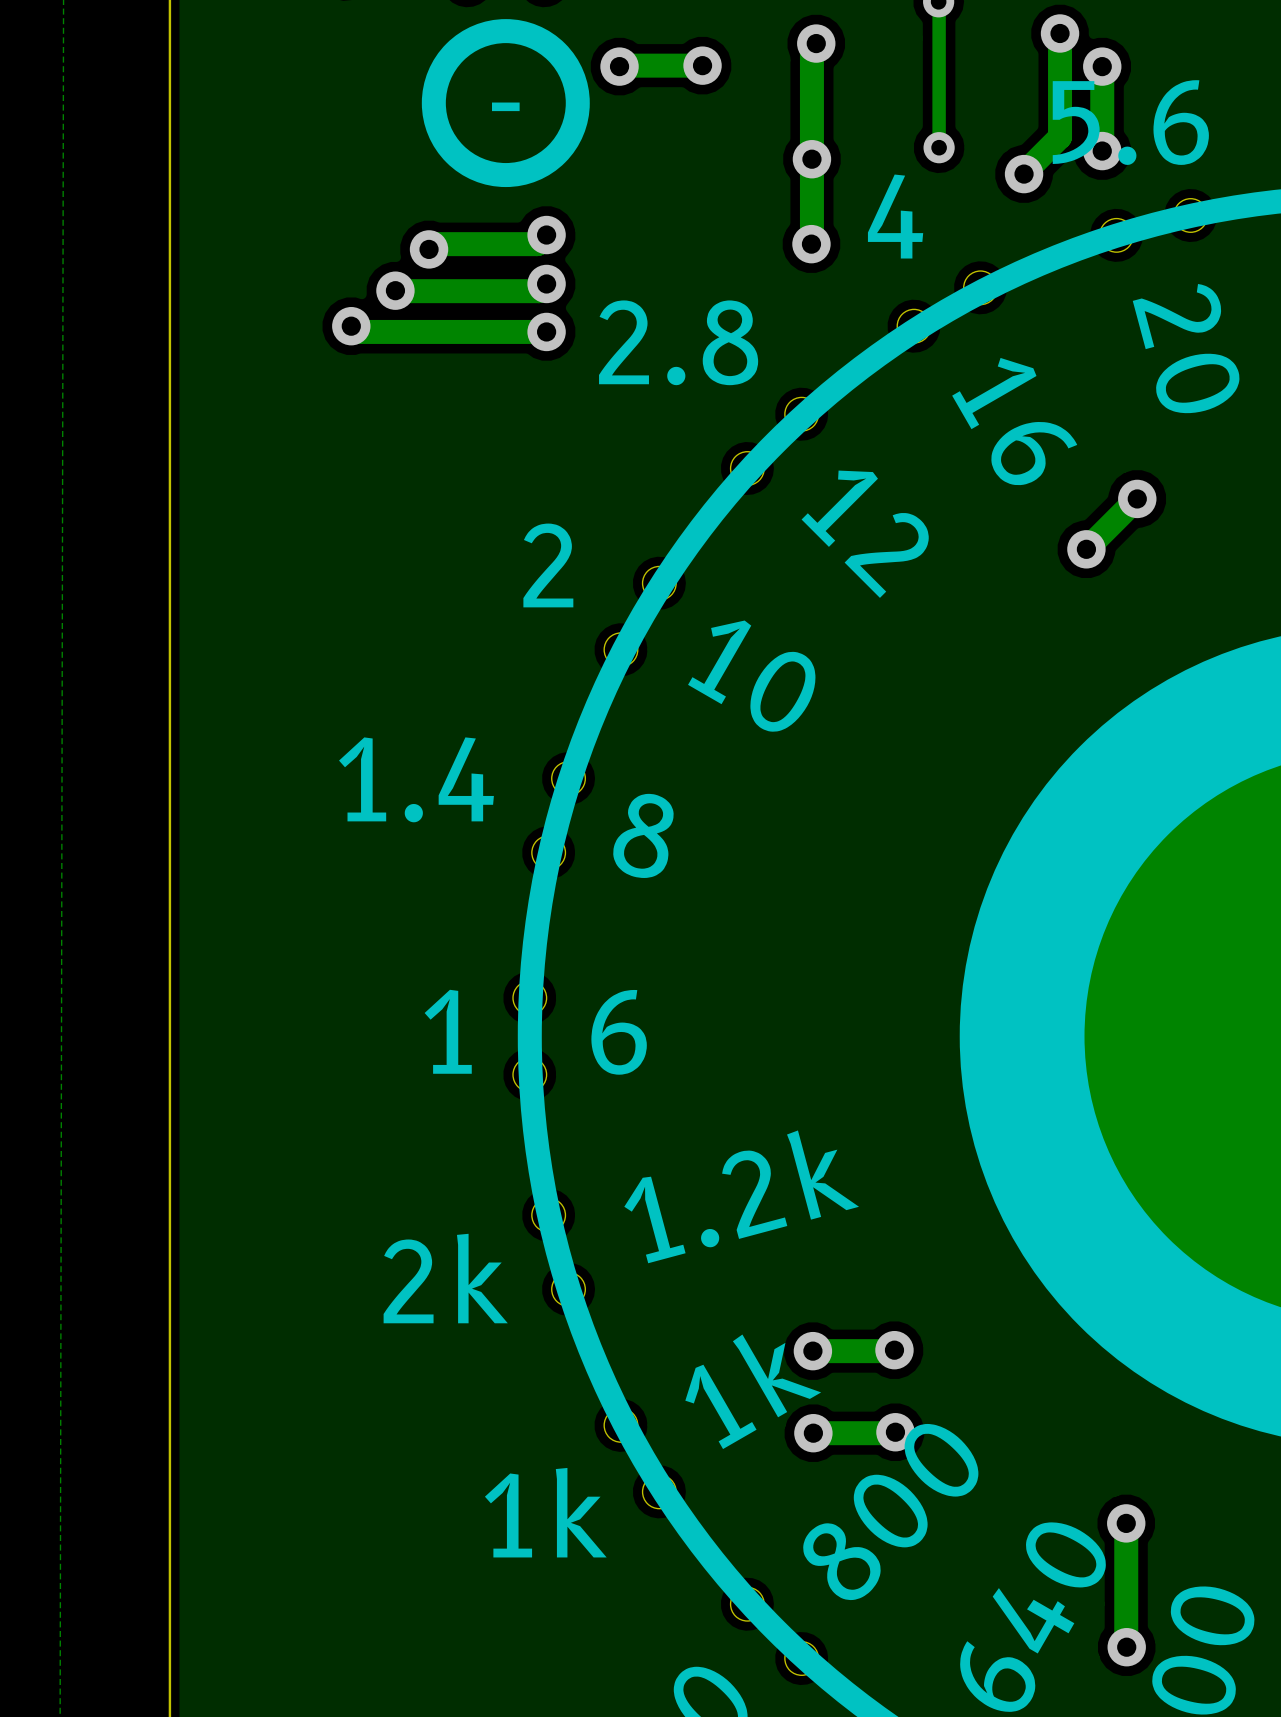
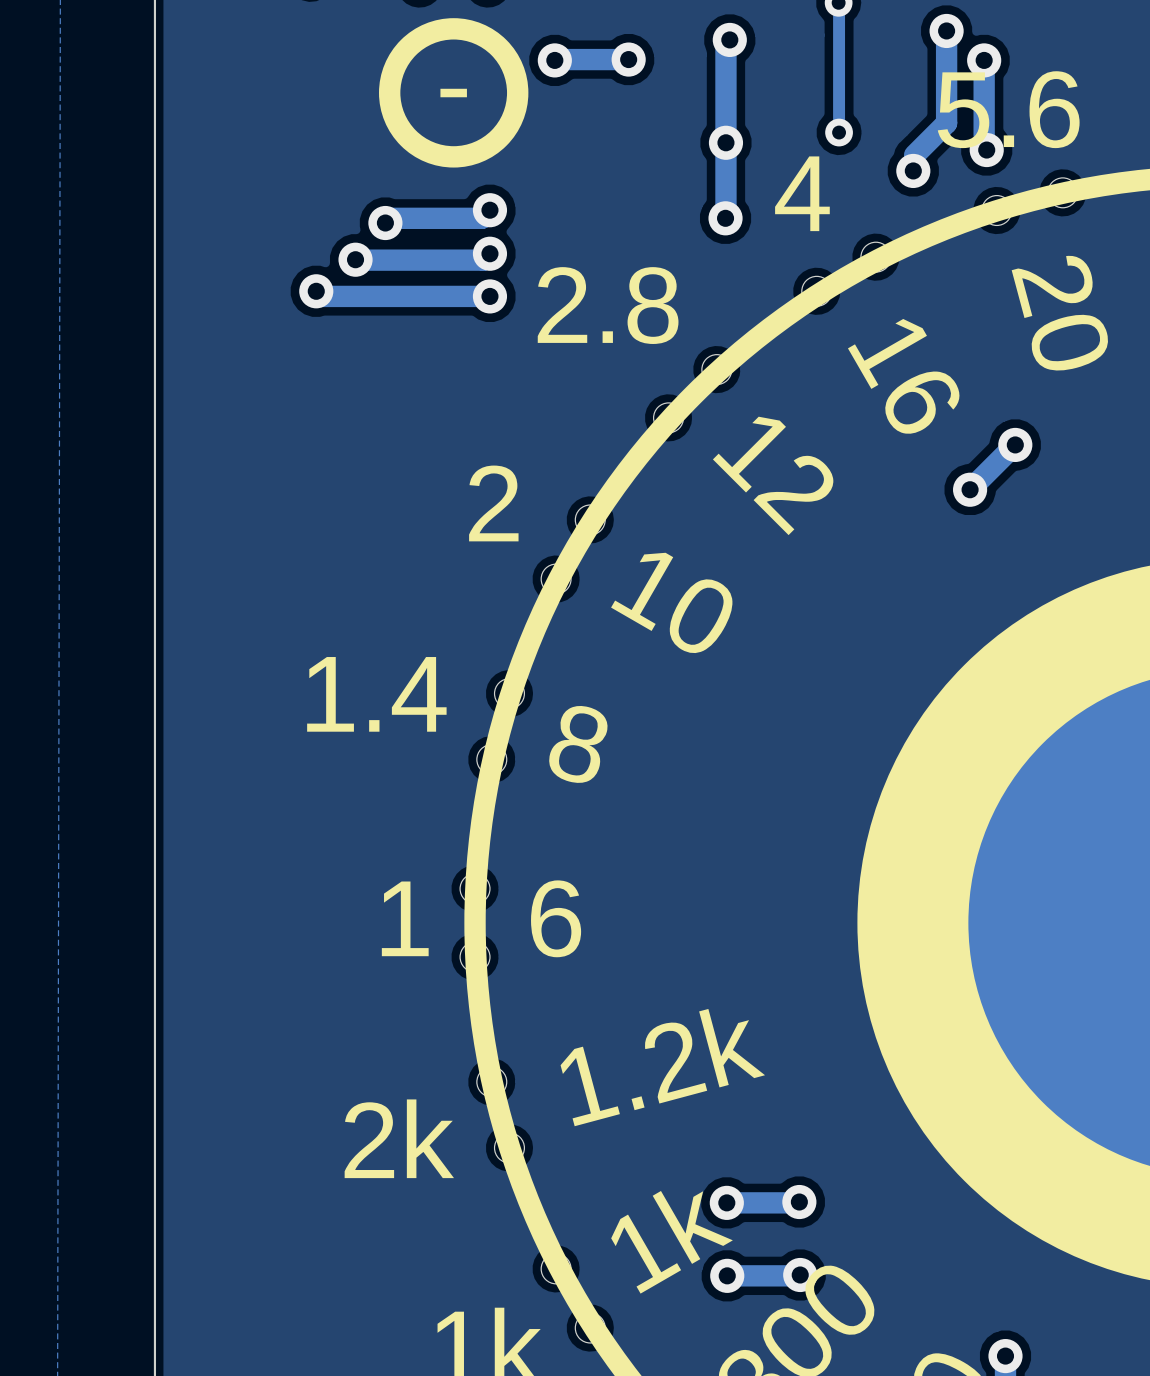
via position: (1102, 151) -> (986, 150)
via position: (1024, 174) -> (913, 170)

